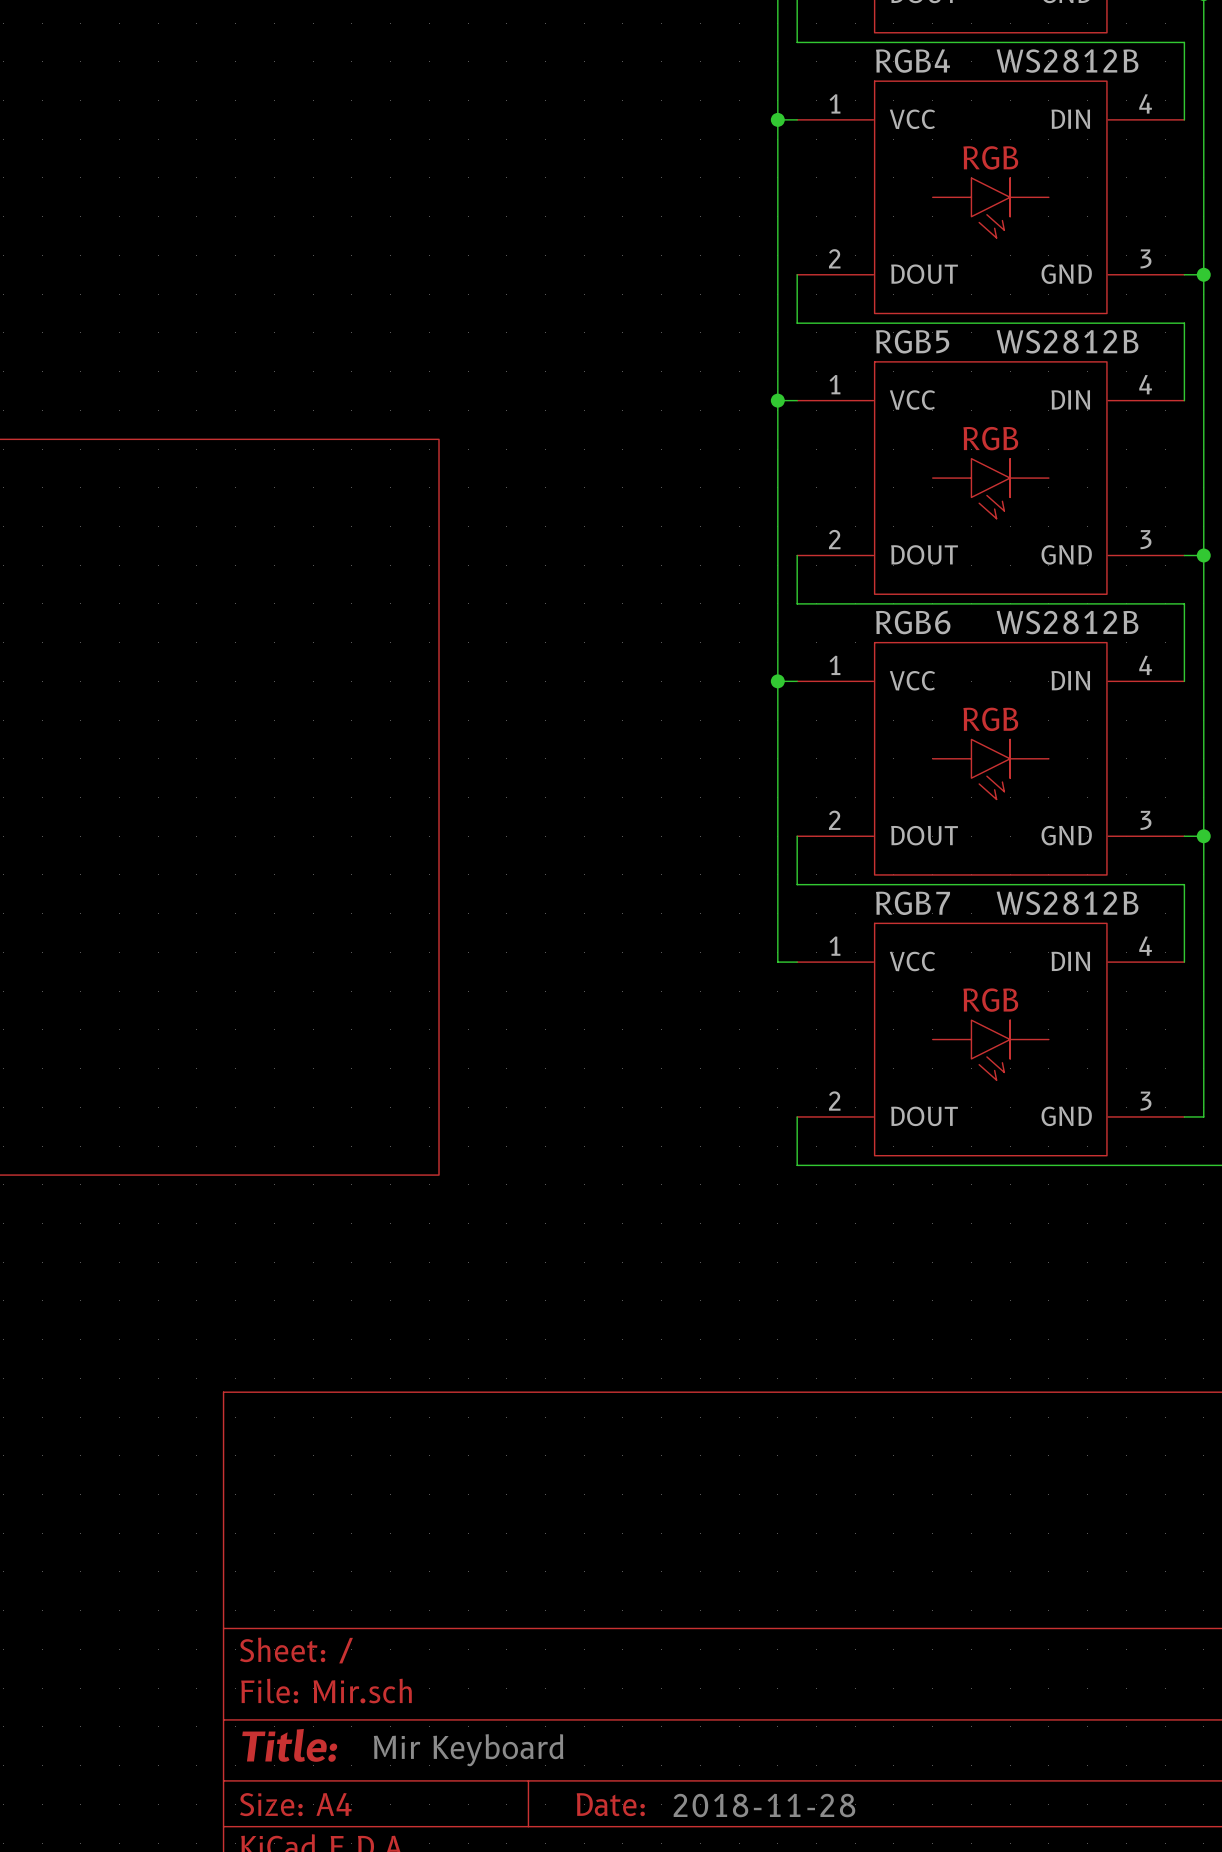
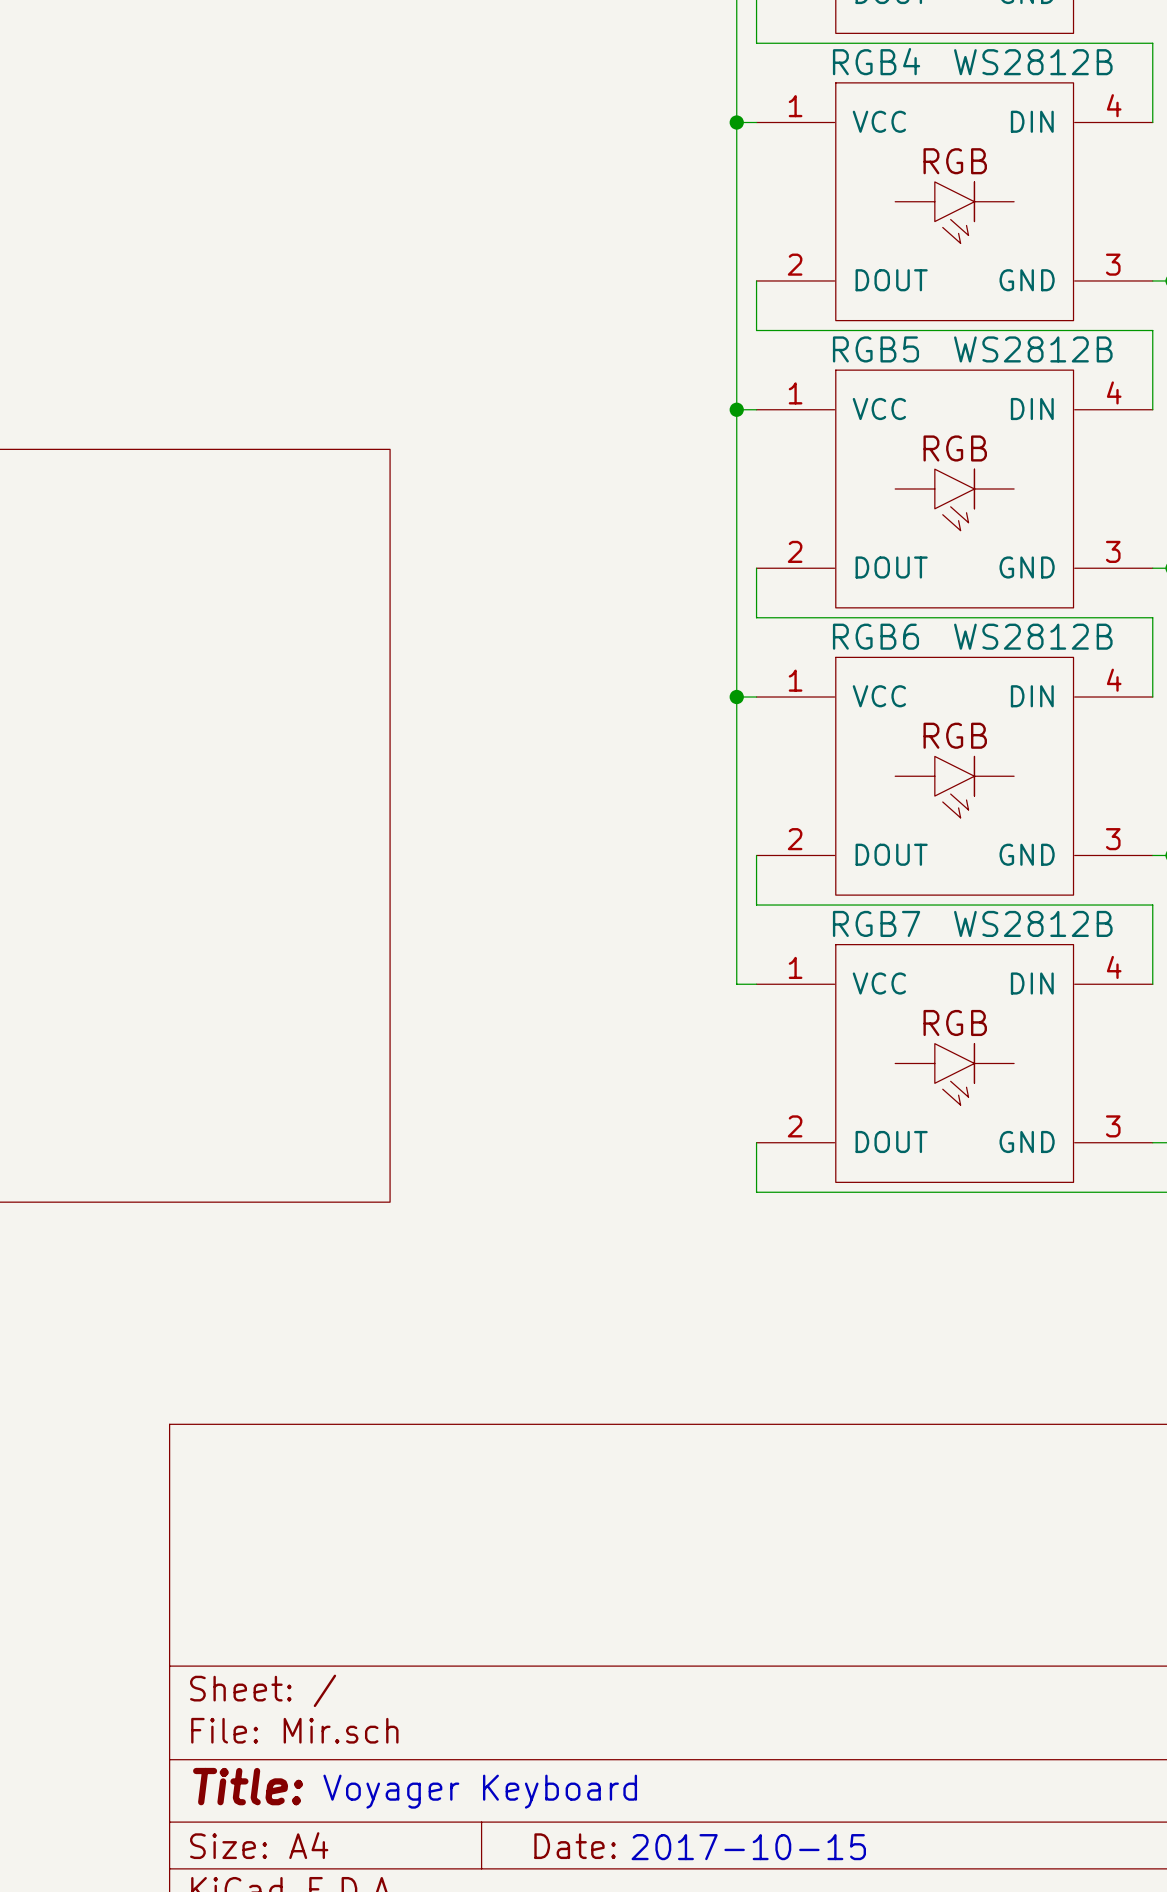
text: Mir Keyboard (468, 1750) -> Voyager Keyboard (480, 1791)
text: 2018-11-28 (764, 1805) -> 2017-10-15 (748, 1847)

